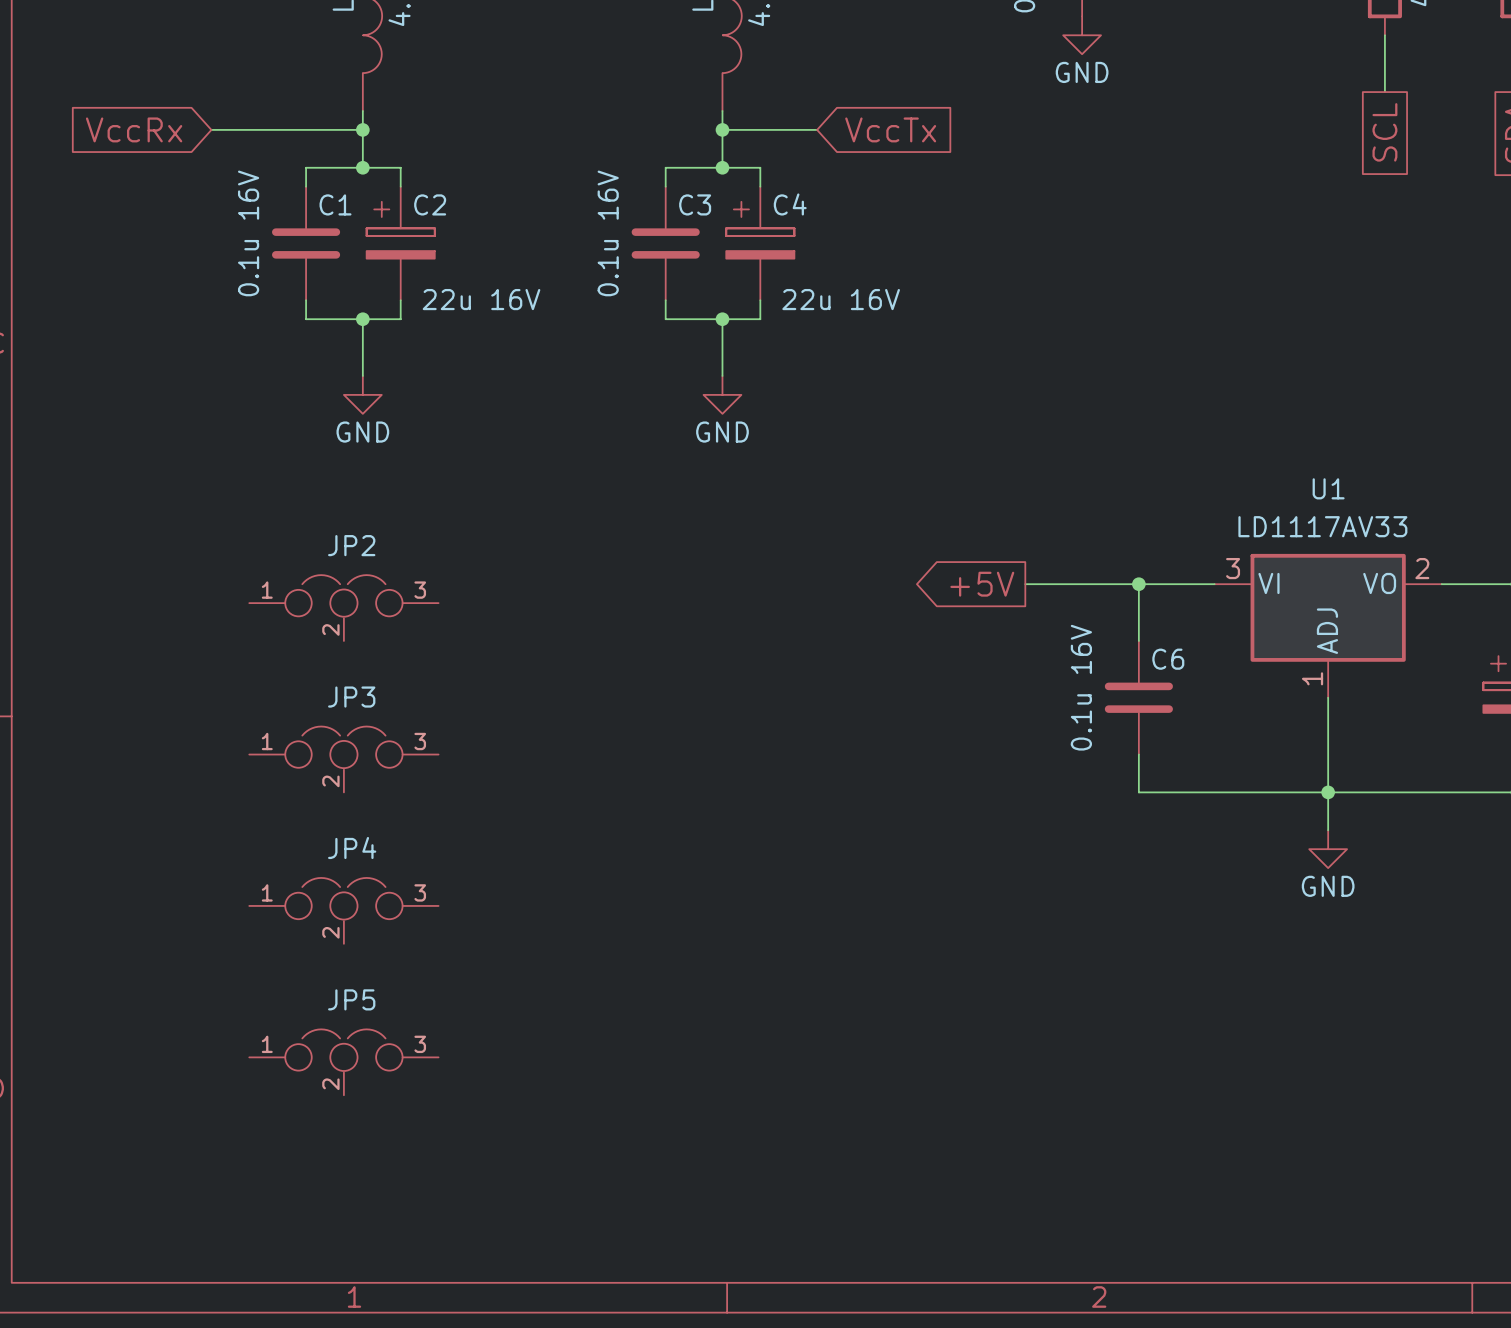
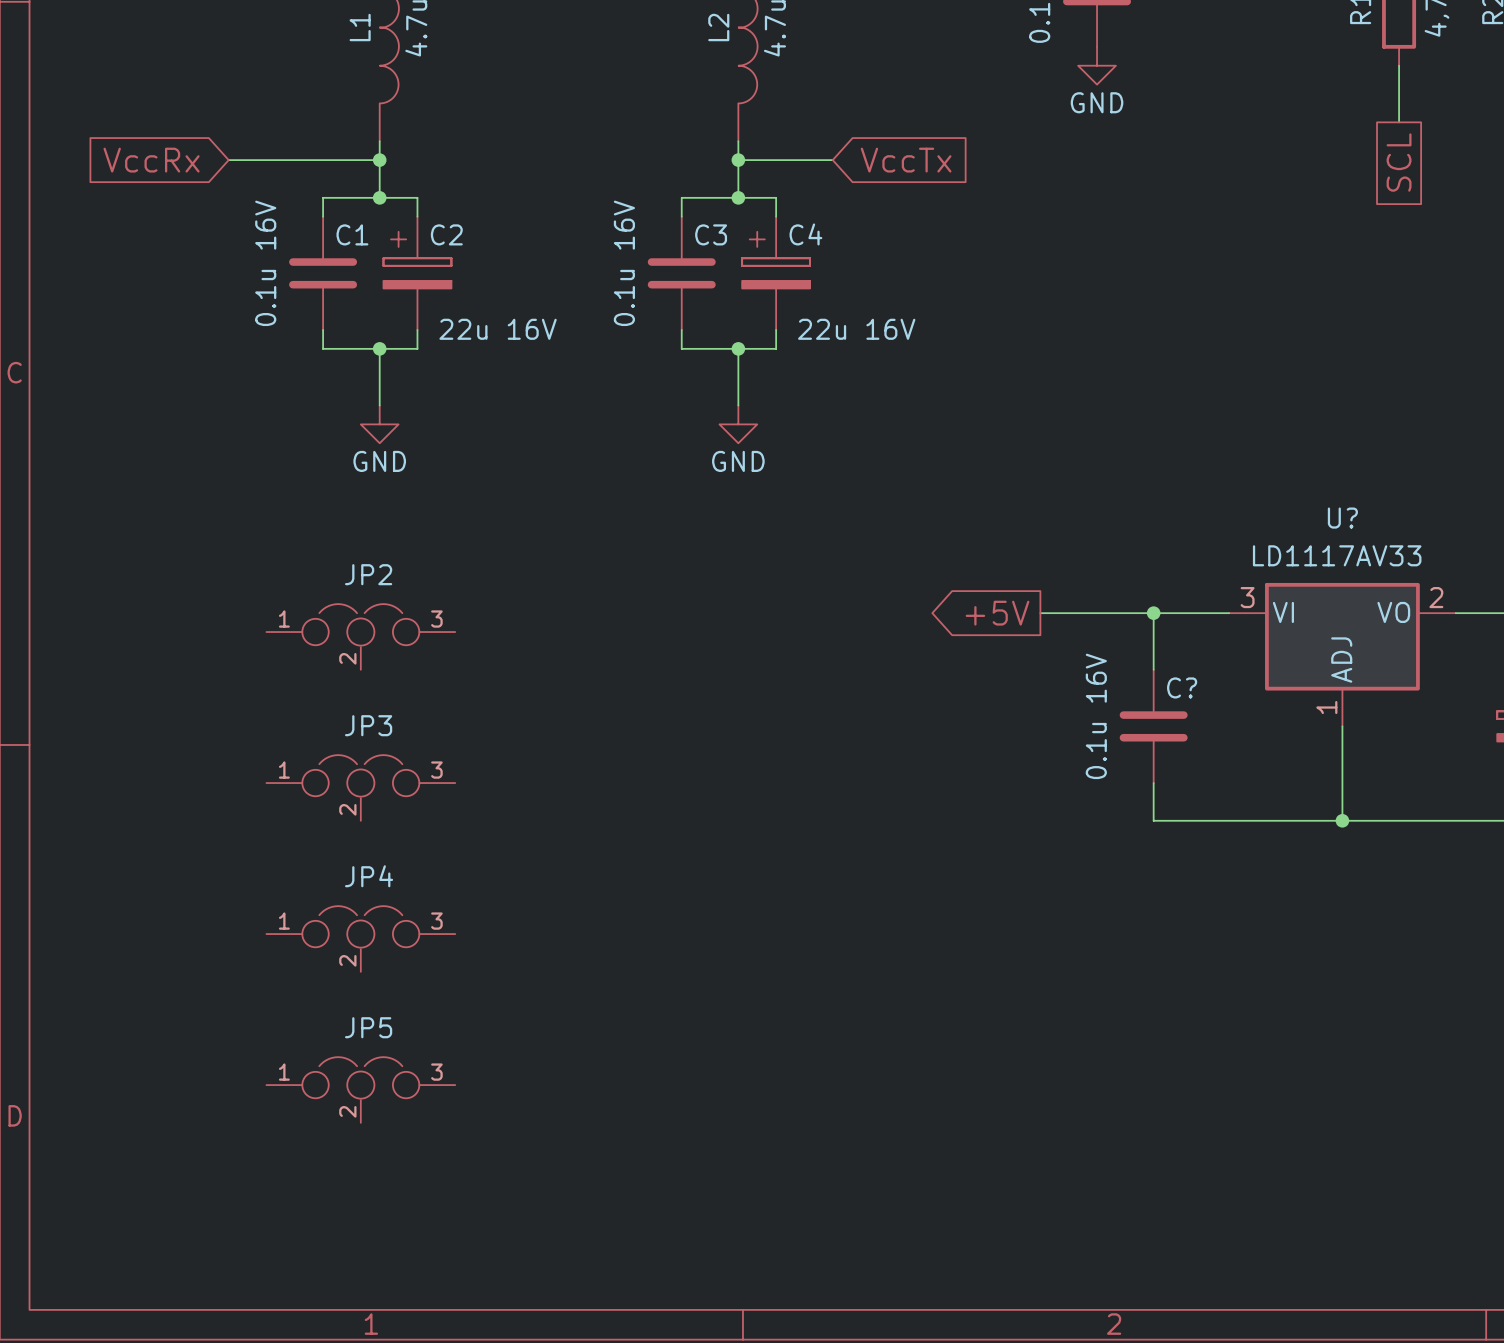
U1 name: U1 (1328, 488) -> U? (1342, 518)
C6 name: C6 (1168, 659) -> C? (1182, 687)
wire: (1328, 792) (1328, 830) -> none
power symbol: GND (1328, 849) -> none

